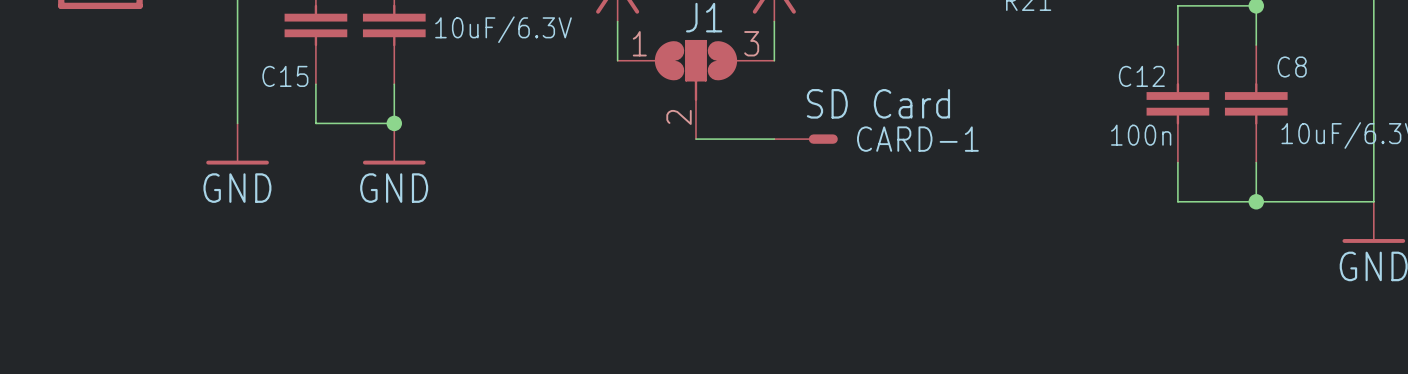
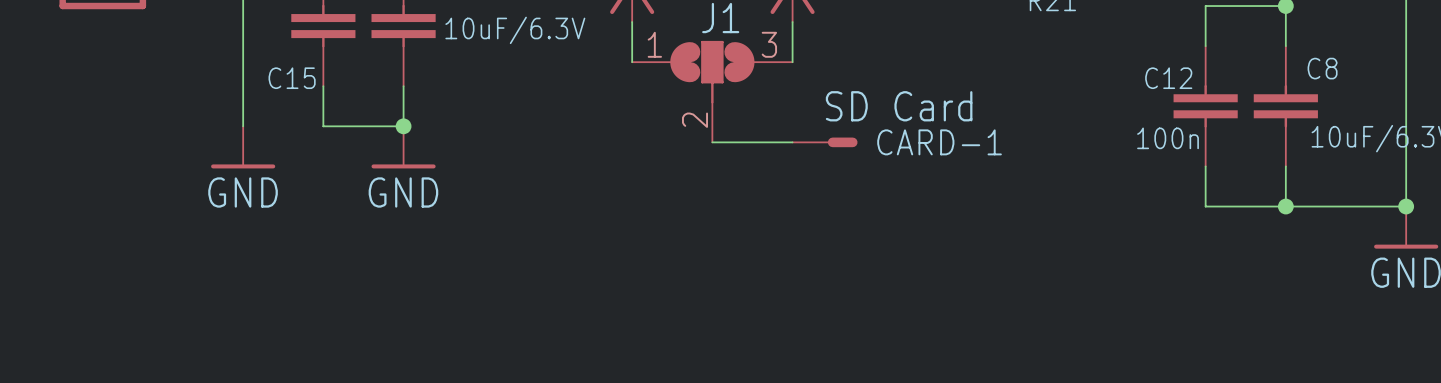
junction: none -> (1406, 206)

